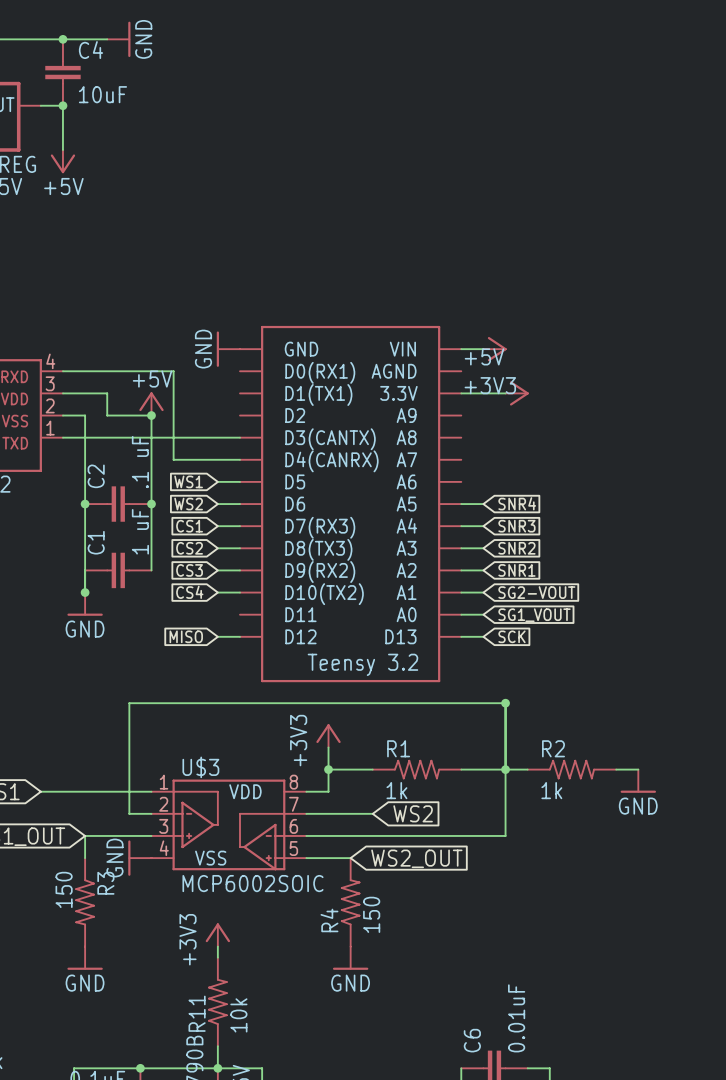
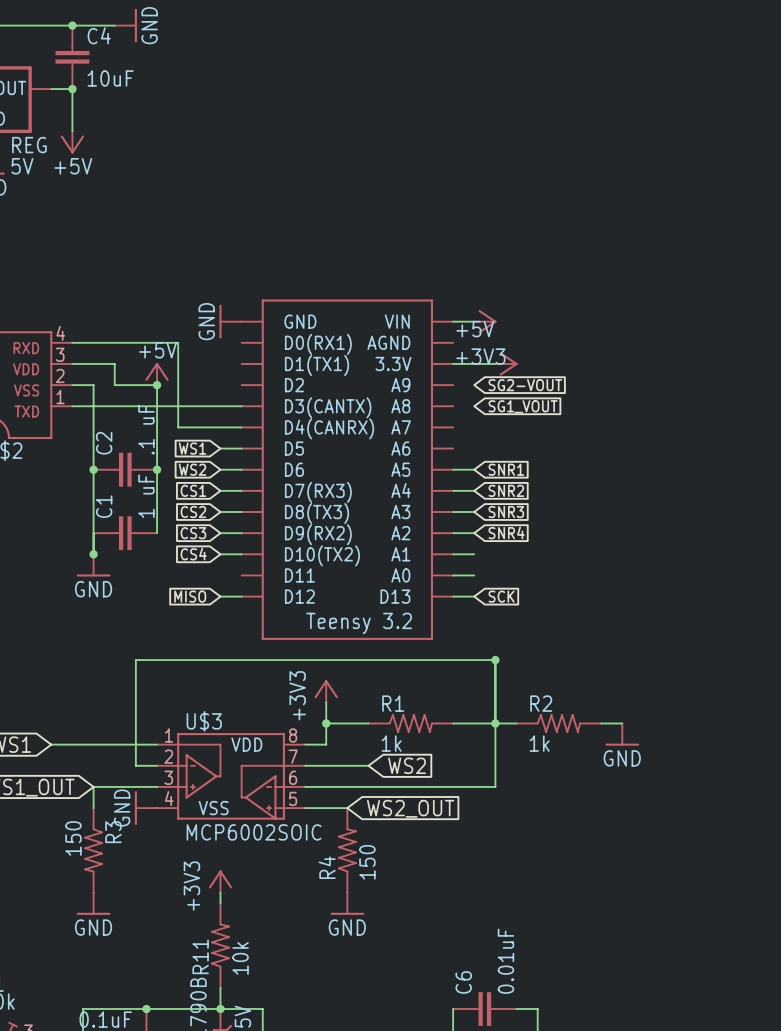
global label: SNR4 (517, 503) -> SNR1 (506, 469)
global label: SNR3 (516, 526) -> SNR2 (506, 490)
global label: SNR2 (516, 548) -> SNR3 (506, 512)
global label: SNR1 (516, 570) -> SNR4 (506, 532)
global label position: SG2-VOUT (536, 592) -> SG2-VOUT (525, 385)
global label position: SG1_VOUT (534, 615) -> SG1_VOUT (523, 406)

